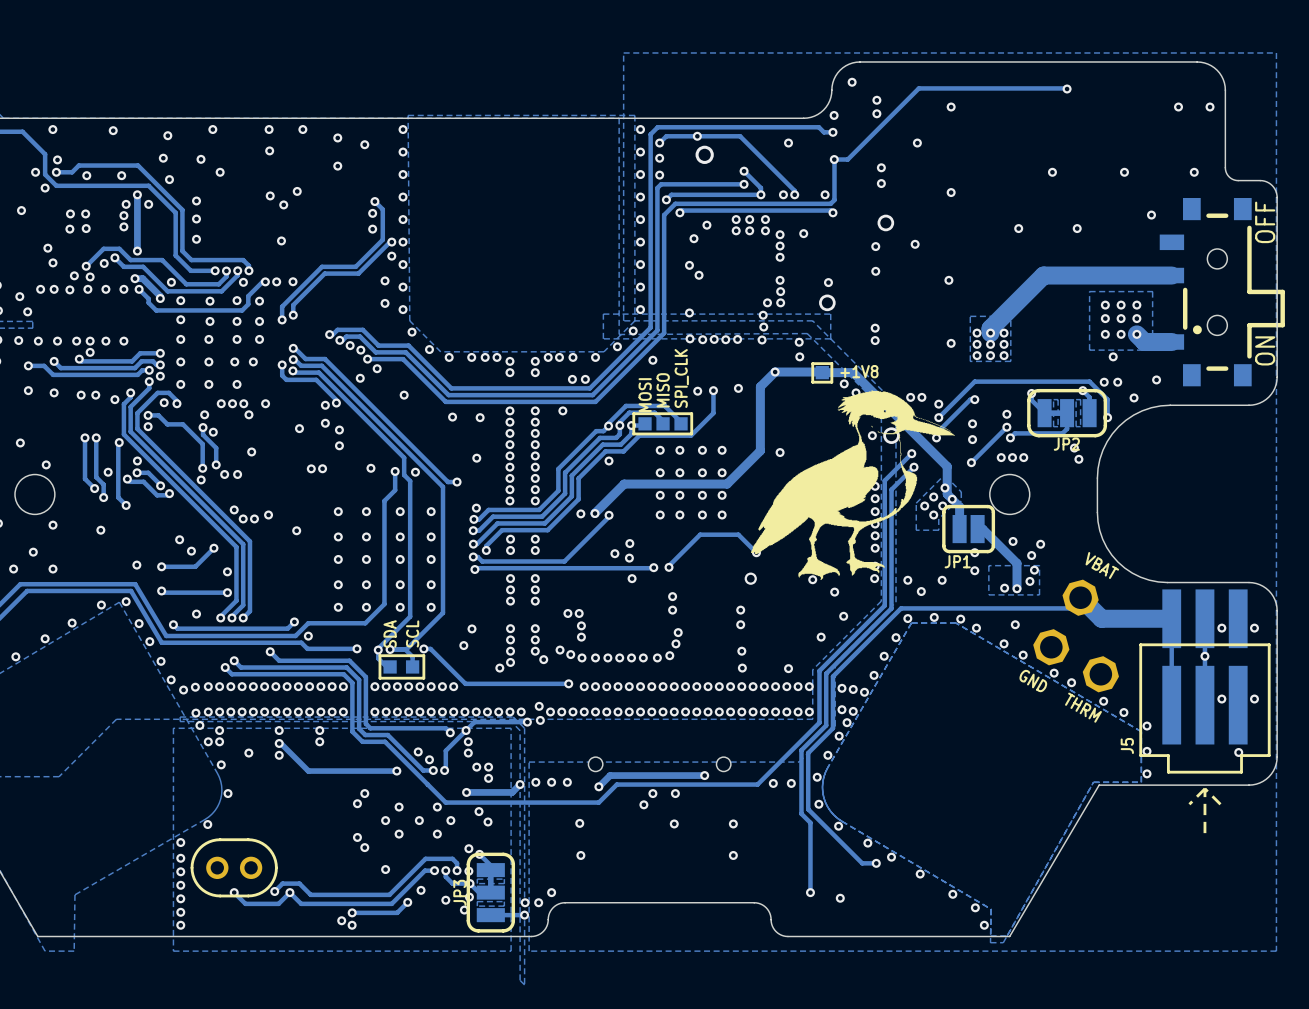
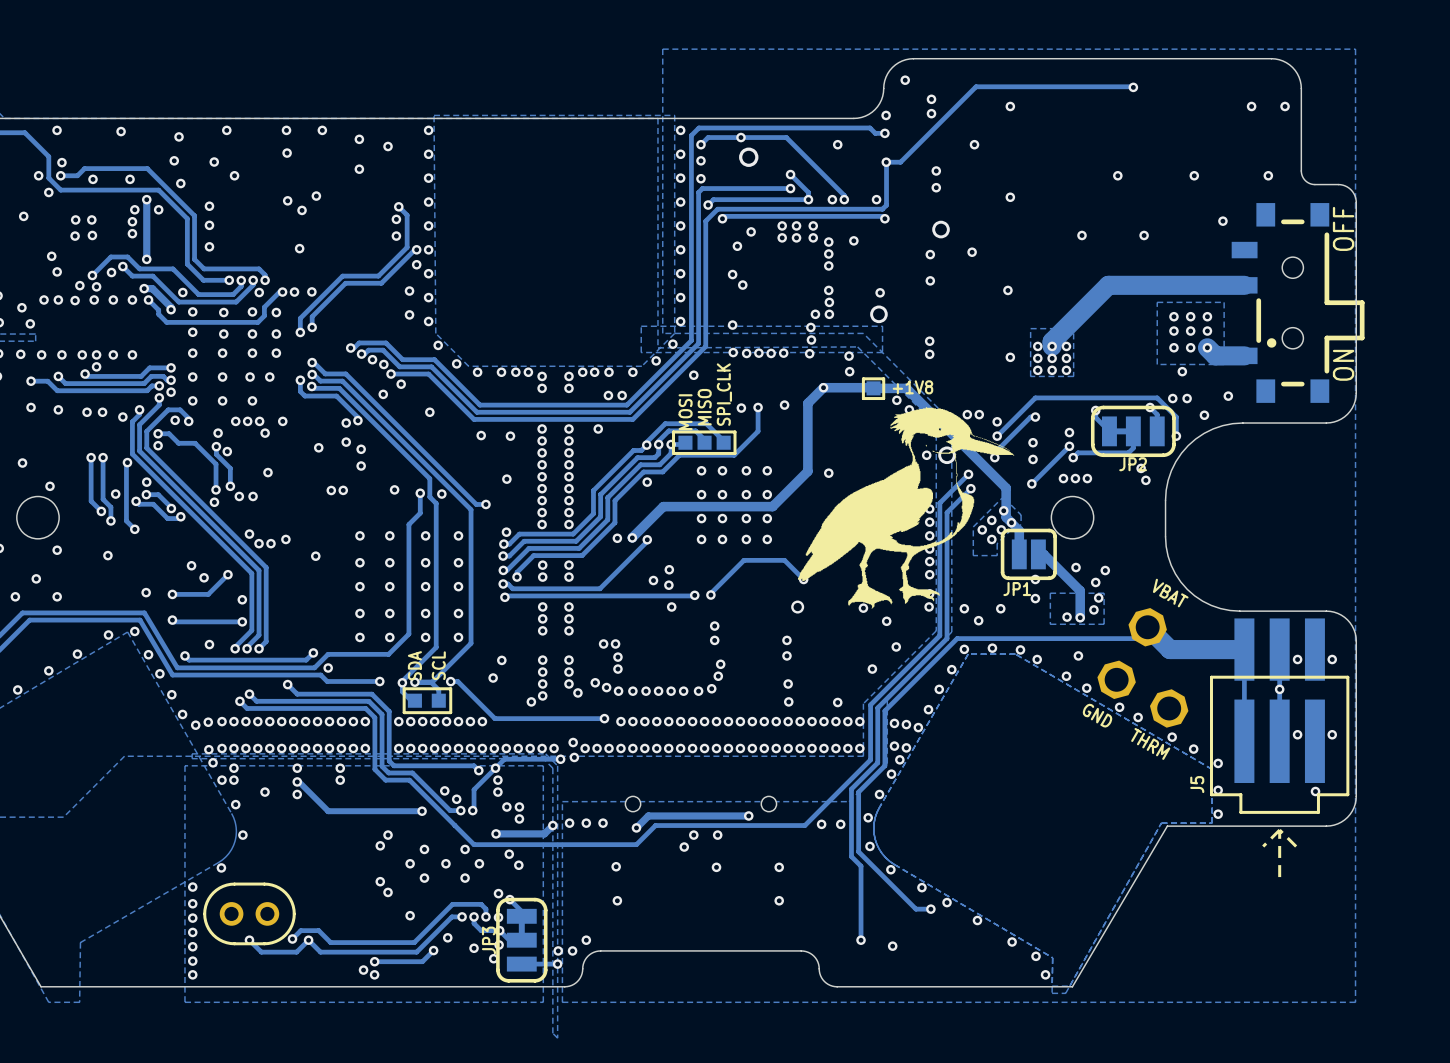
zone outline: (1058, 399) (1053, 399) (1053, 426) (1058, 426) (1058, 399) -> none
zone outline: (1080, 399) (1076, 399) (1076, 426) (1080, 426) (1080, 399) -> none
zone outline: (504, 879) (504, 883) (477, 883) (477, 879) (504, 879) -> none
zone outline: (504, 901) (504, 906) (477, 906) (477, 901) (504, 901) -> none

